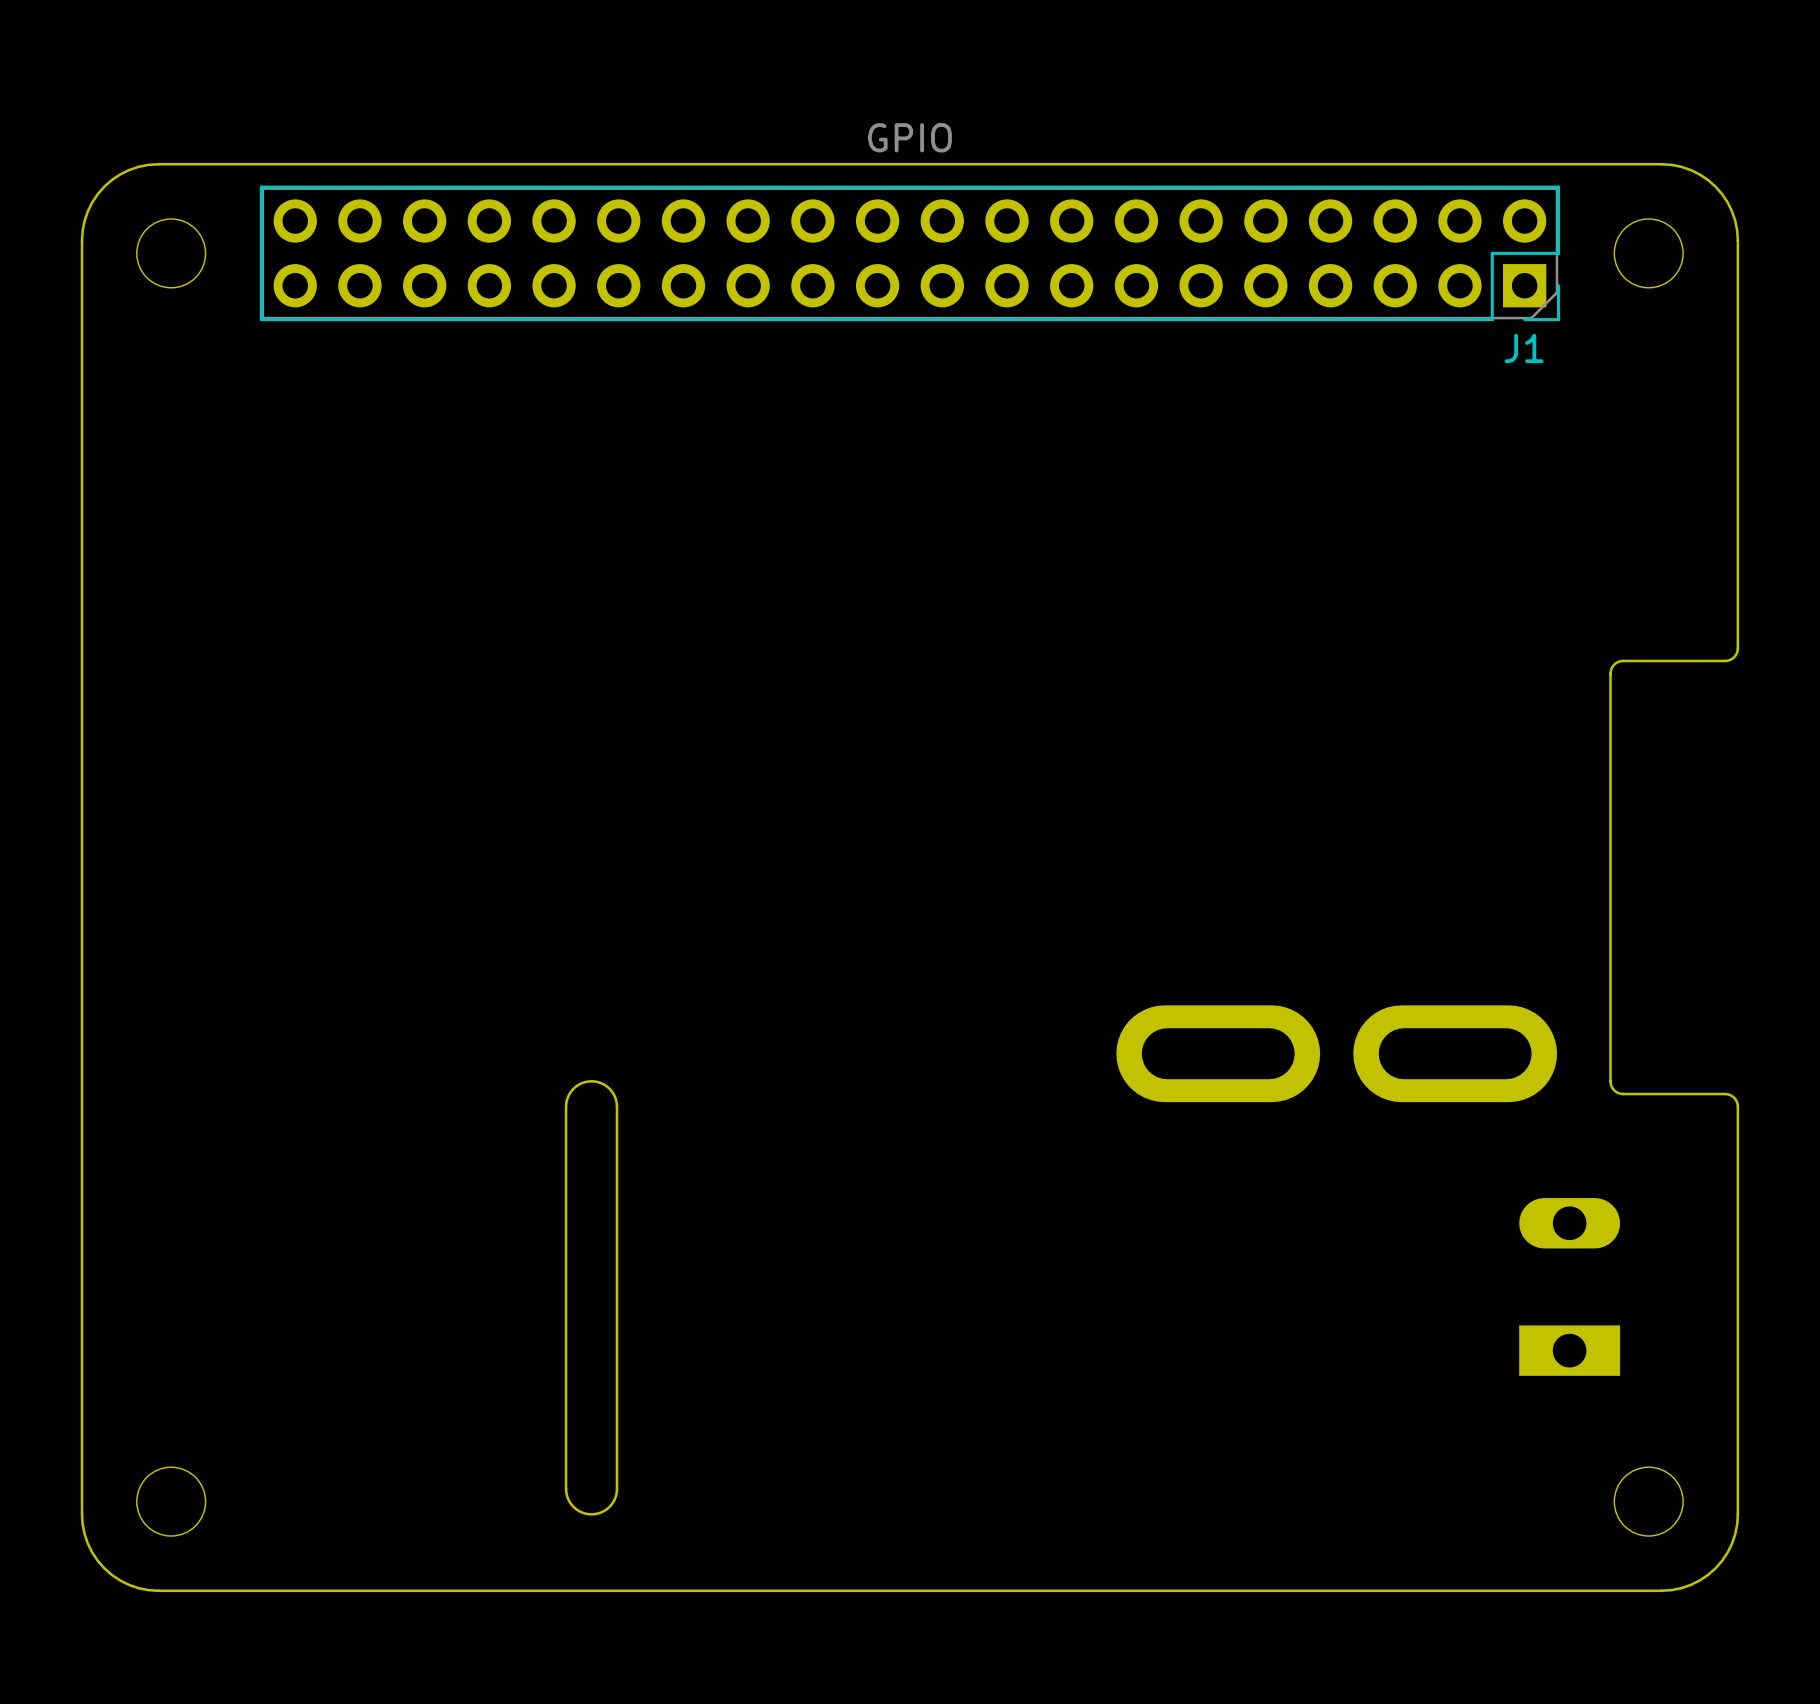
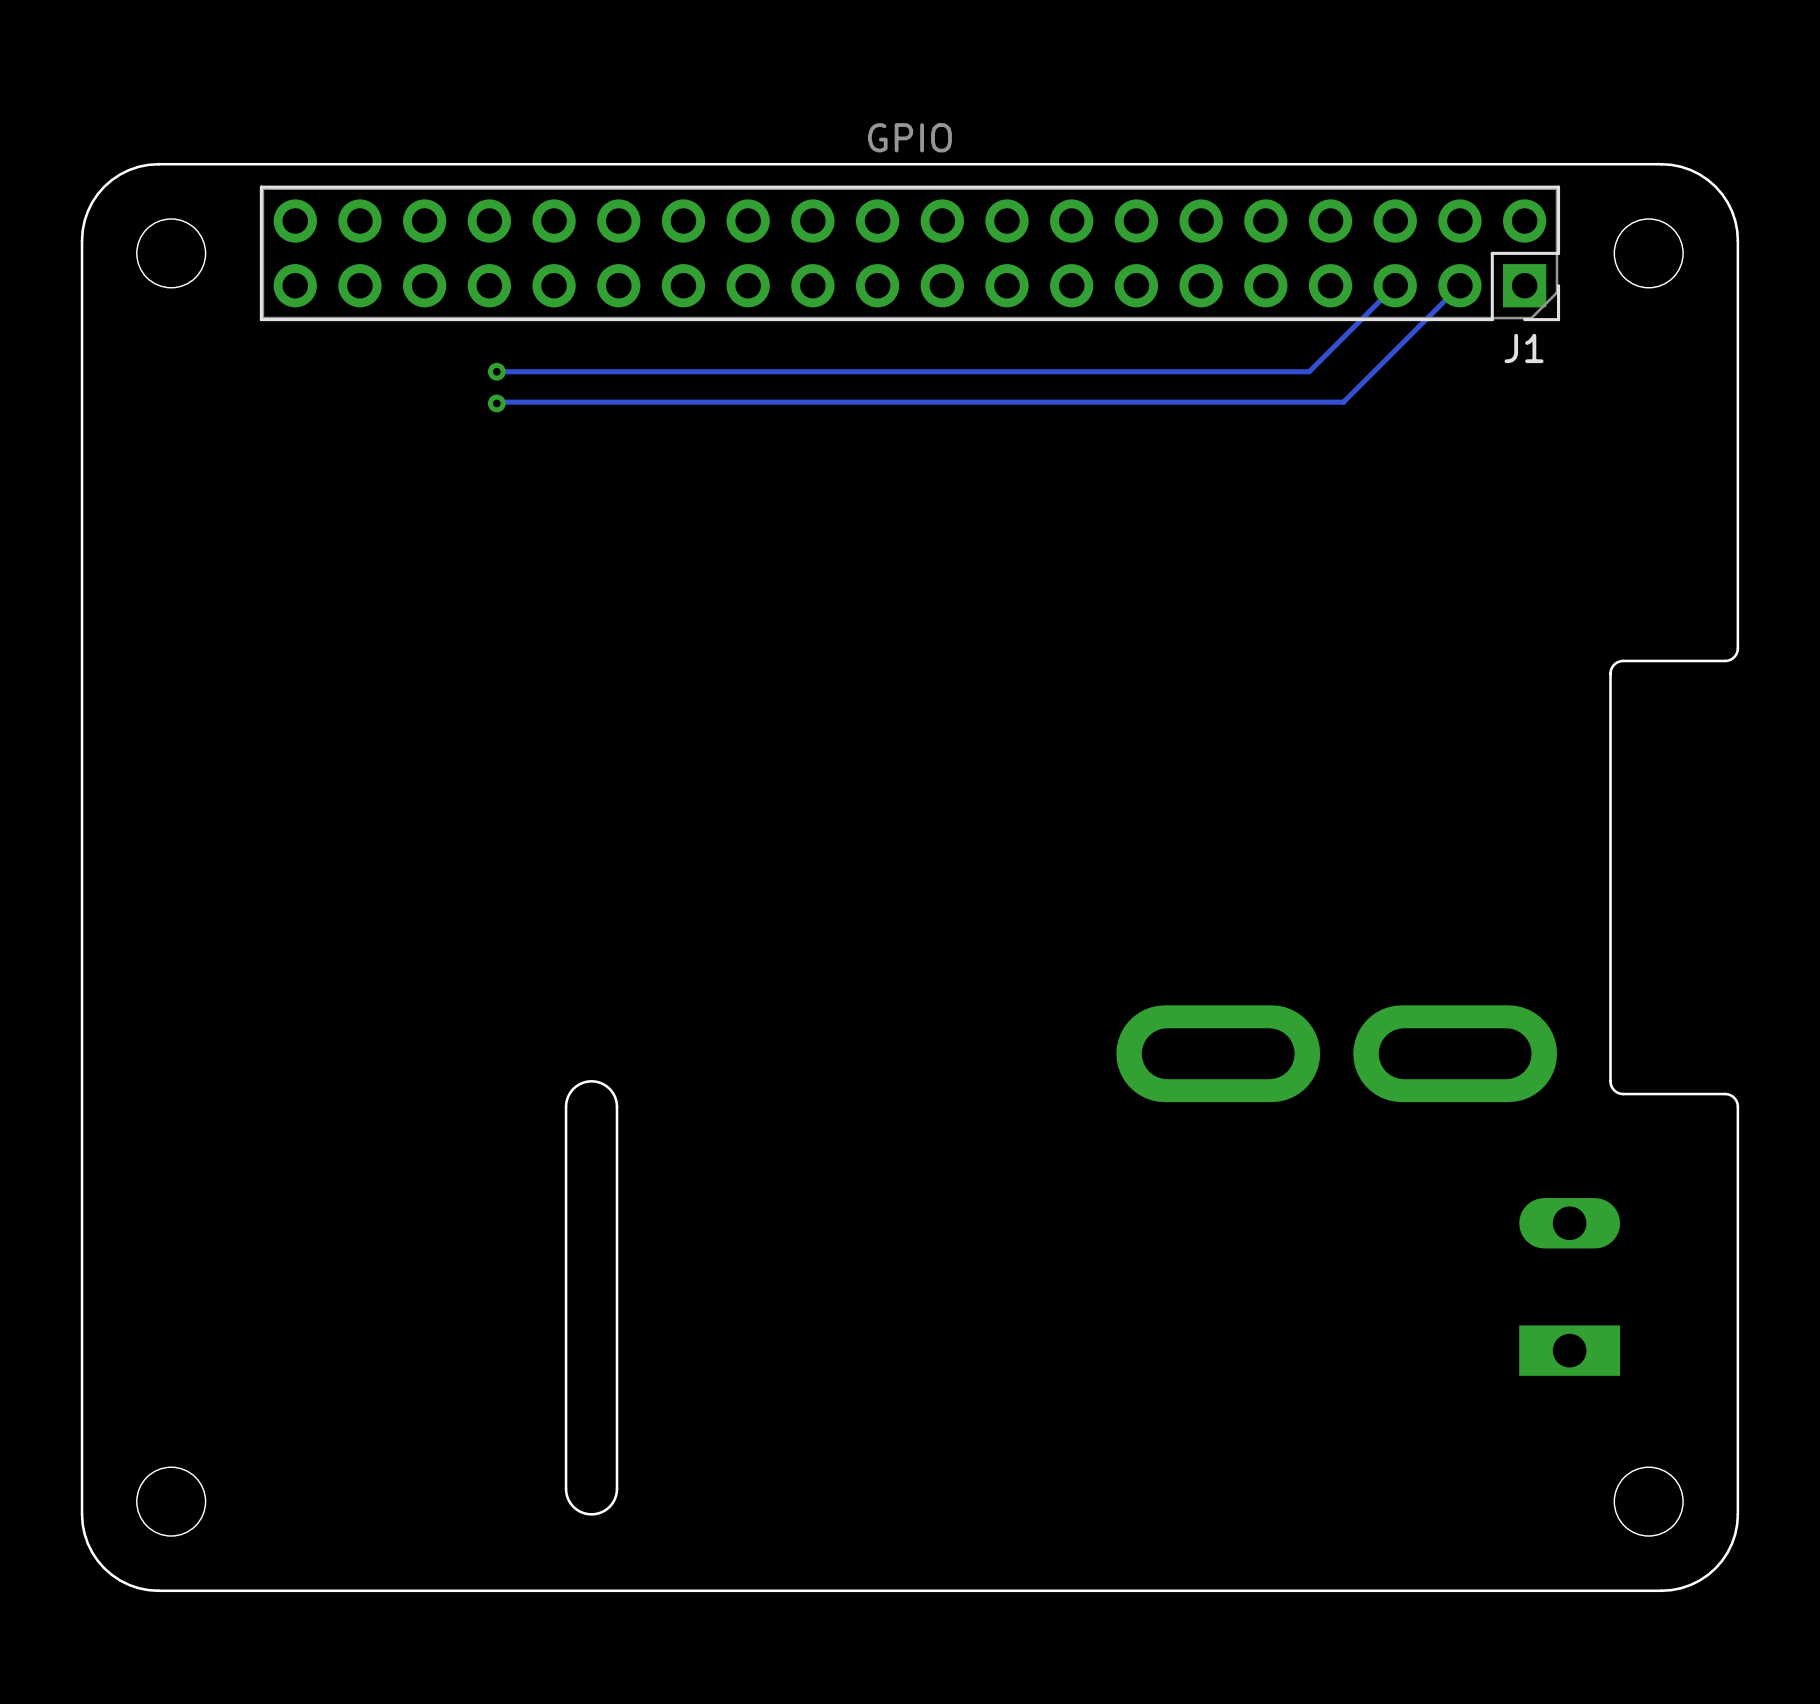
track: none -> (1395, 285) (1309, 371) (496, 371)
track: none -> (1459, 285) (1343, 402) (496, 403)
via: none -> (496, 371)
via: none -> (496, 403)

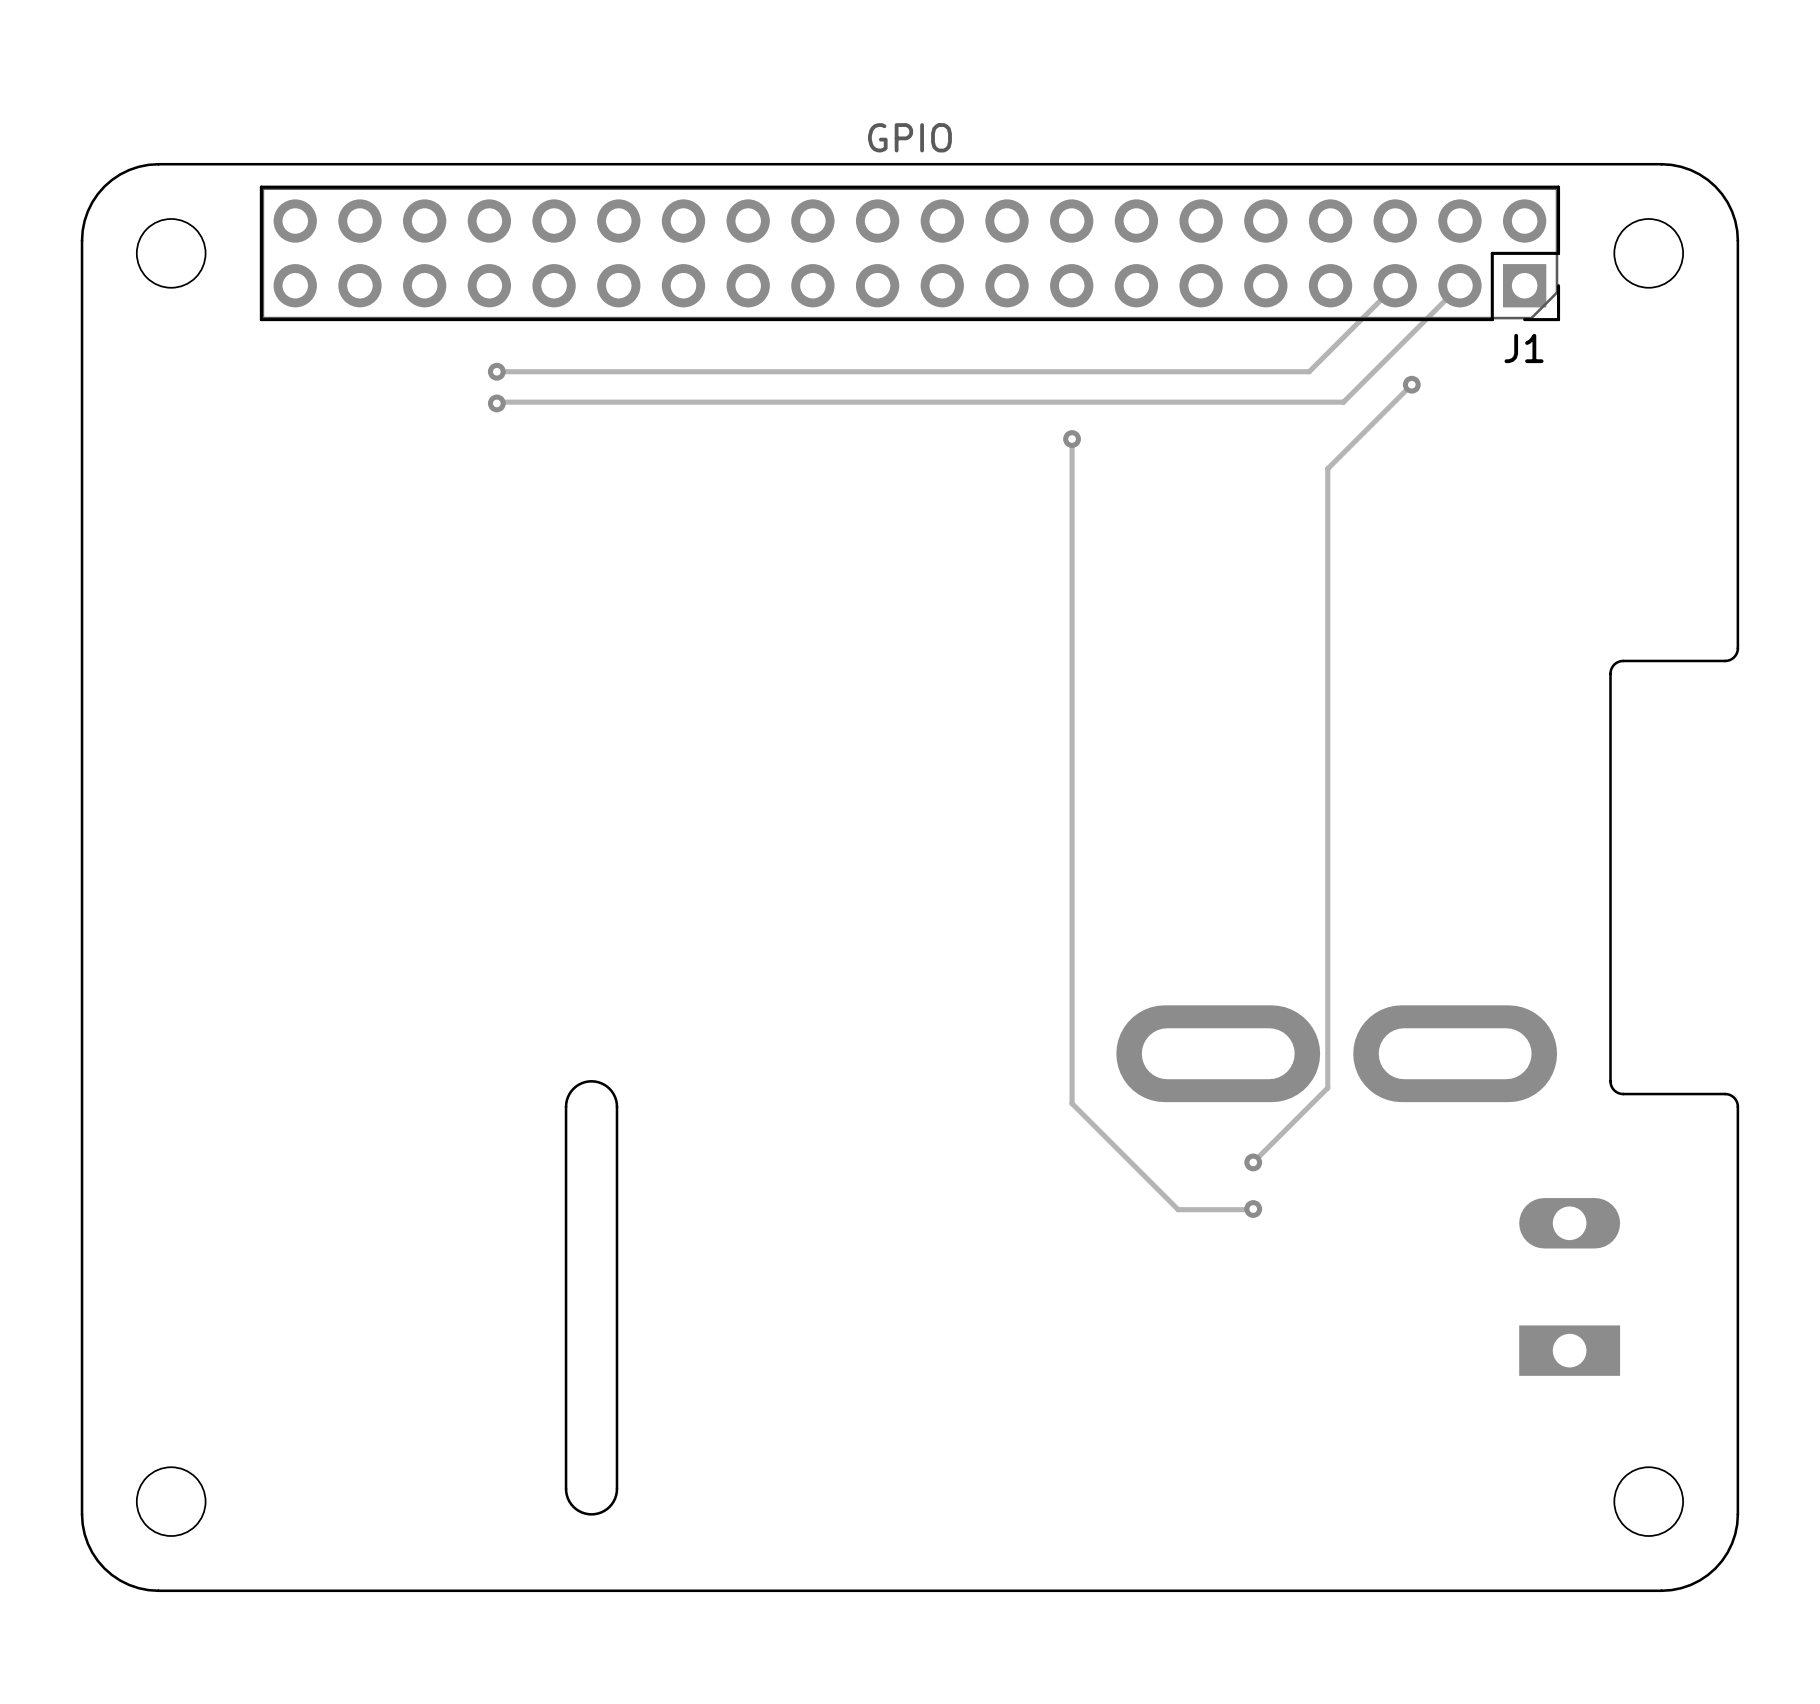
track: none -> (1411, 384) (1327, 468) (1327, 1087) (1253, 1162)
via: none -> (1411, 384)
track: none -> (1072, 439) (1072, 1103) (1178, 1209) (1253, 1209)
via: none -> (1072, 439)
via: none -> (1253, 1162)
via: none -> (1253, 1209)

